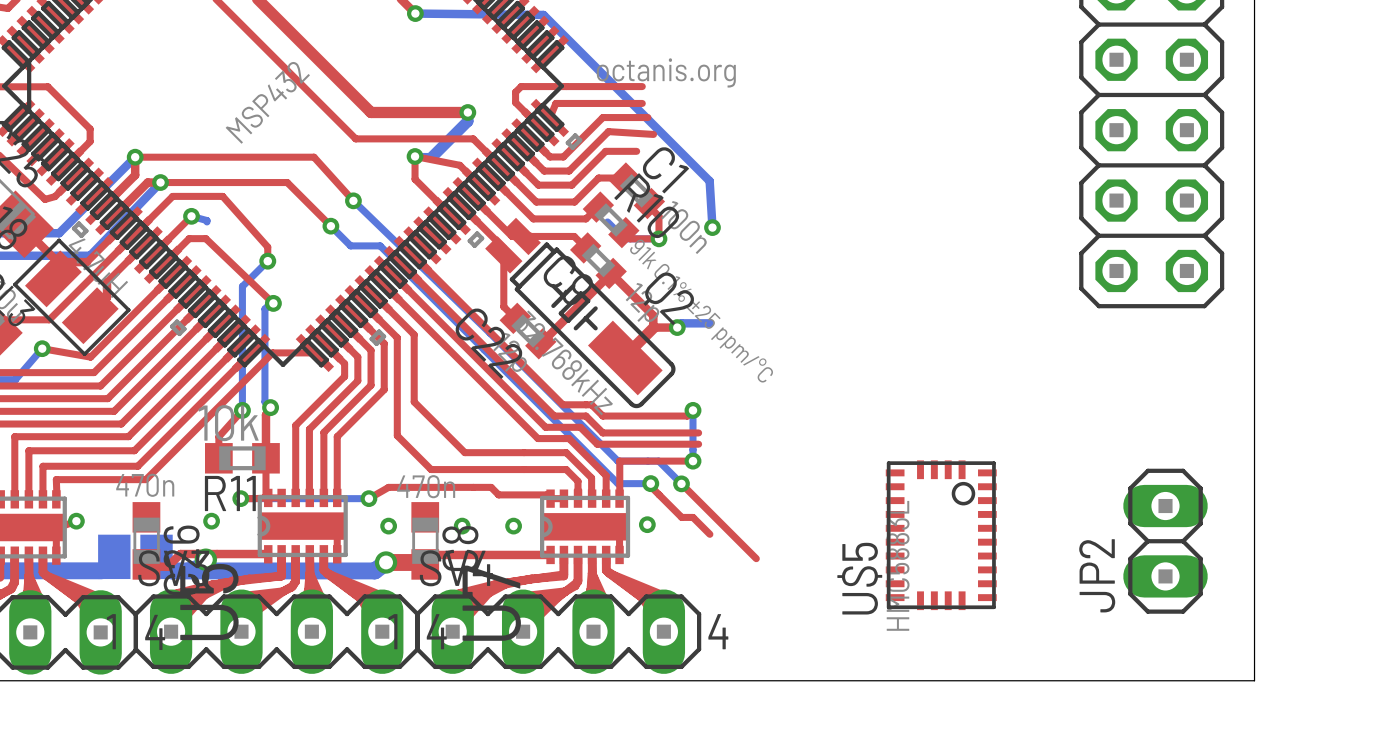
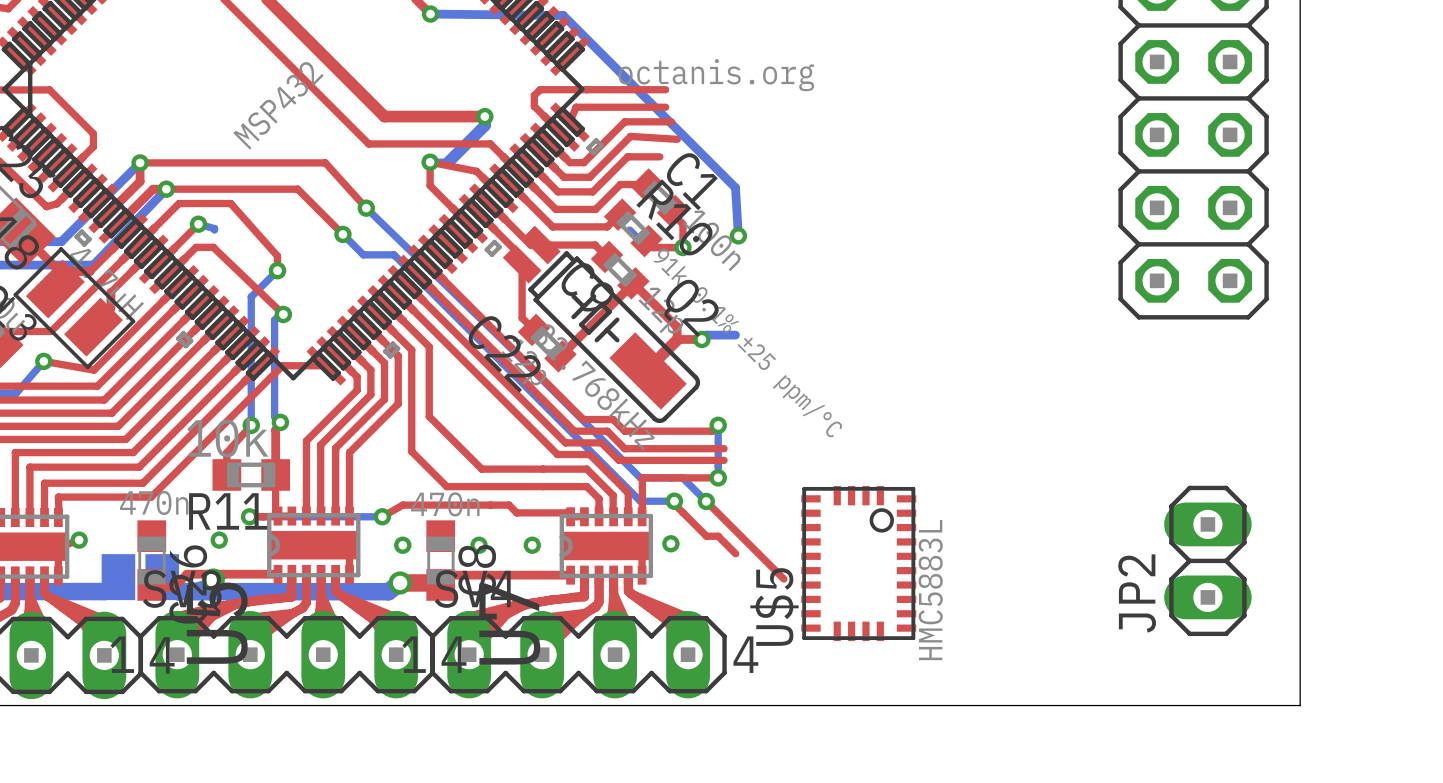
U$5 position: (941, 535) -> (858, 563)

